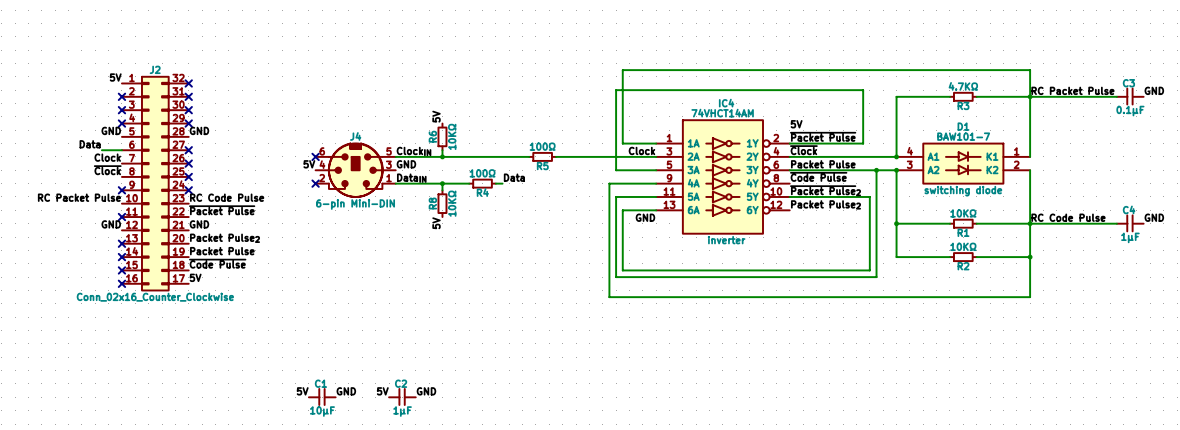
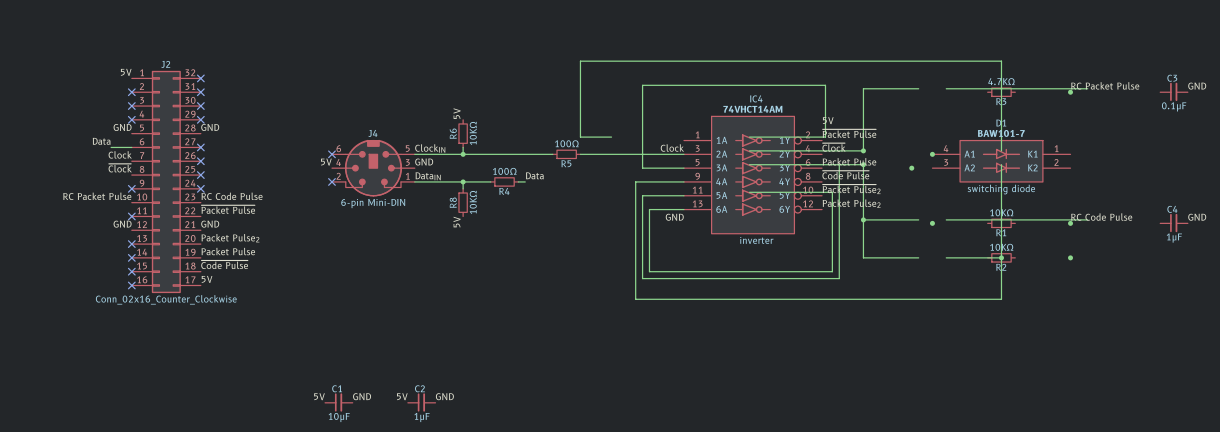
wire: (793, 90) (863, 90) (863, 143) (789, 143) -> (825, 85) (825, 137) (749, 137)
wire: none -> (918, 88) (863, 88) (863, 150) (749, 150)
wire: none -> (946, 88) (1087, 88)
wire: (949, 96) (896, 96) (896, 156) (789, 156) -> none
wire: (976, 96) (1116, 96) -> none
wire: none -> (611, 137) (580, 137) (580, 61) (1001, 61) (1001, 150)
wire: (656, 143) (622, 143) (622, 70) (1030, 70) (1030, 156) -> none
junction: none -> (863, 150)
wire: none -> (749, 164) (863, 164) (863, 257) (918, 257)
junction: none -> (863, 164)
wire: (789, 170) (896, 170) (896, 257) (909, 257) -> none
wire: (876, 170) (876, 277) (806, 277) -> (839, 164) (839, 278)
junction: (896, 170) -> none
wire: (1030, 170) (1030, 297) (963, 297) -> (1001, 164) (1001, 299)
wire: (789, 196) (869, 196) (869, 270) (799, 270) -> (749, 192) (832, 192) (832, 271)
junction: none -> (863, 219)
wire: none -> (946, 219) (1087, 219)
wire: (896, 223) (949, 223) -> (863, 219) (918, 219)
wire: (976, 223) (1116, 223) -> none
wire: none -> (987, 257) (1001, 257)
junction: none -> (1001, 257)
wire: (976, 257) (1030, 257) -> none

